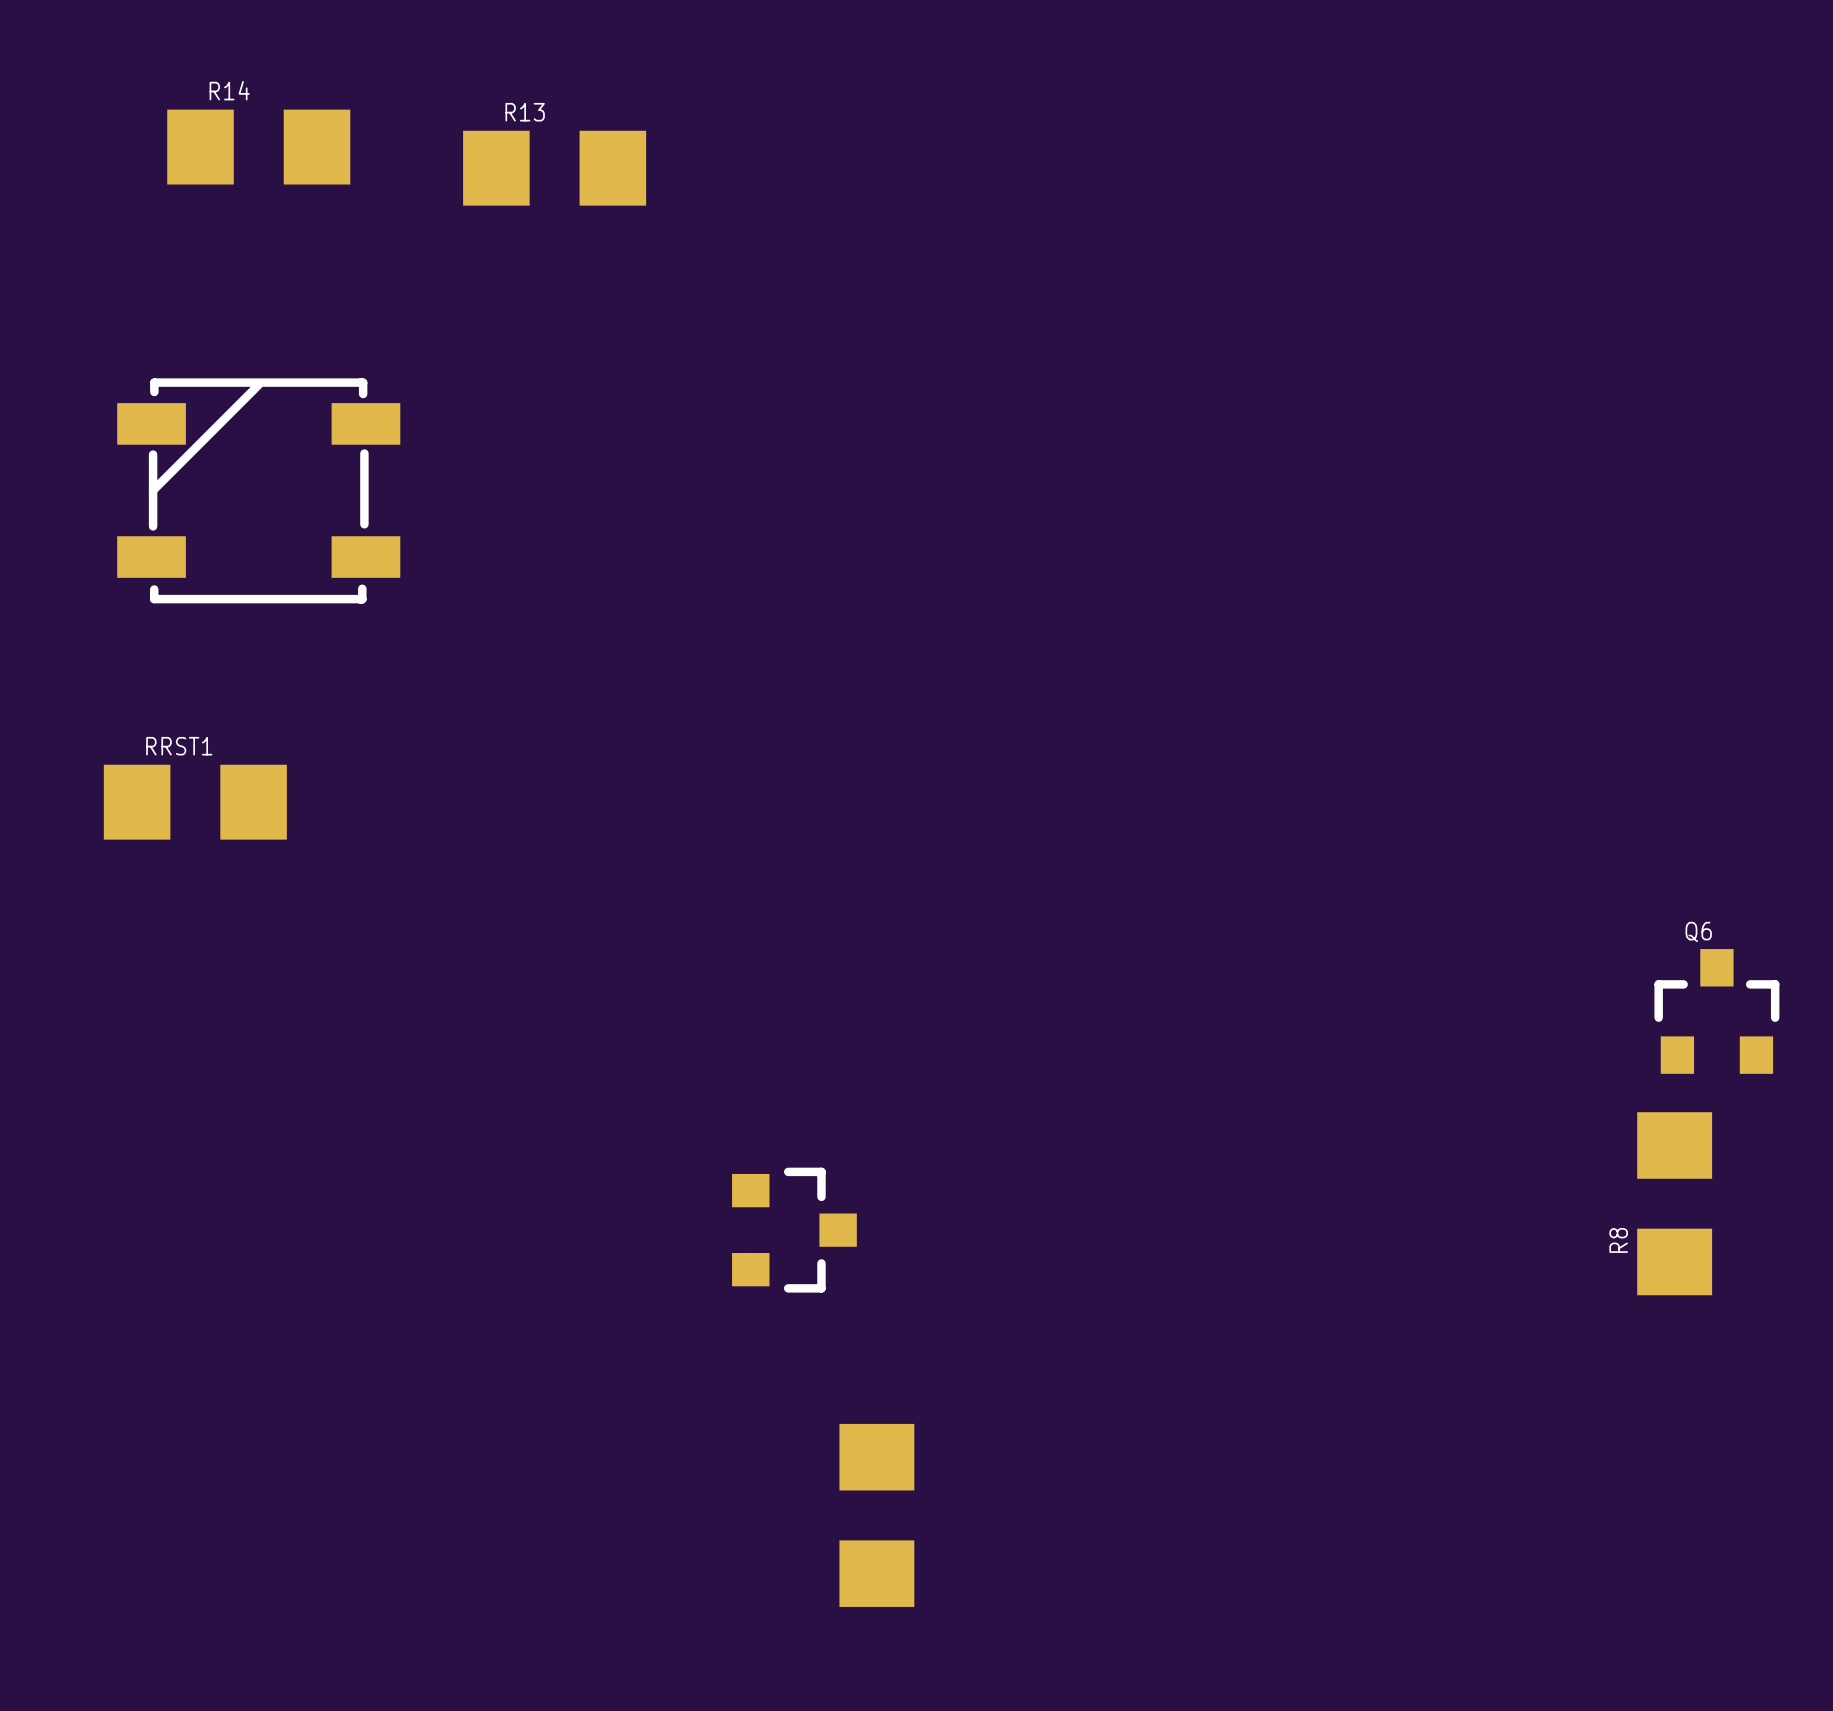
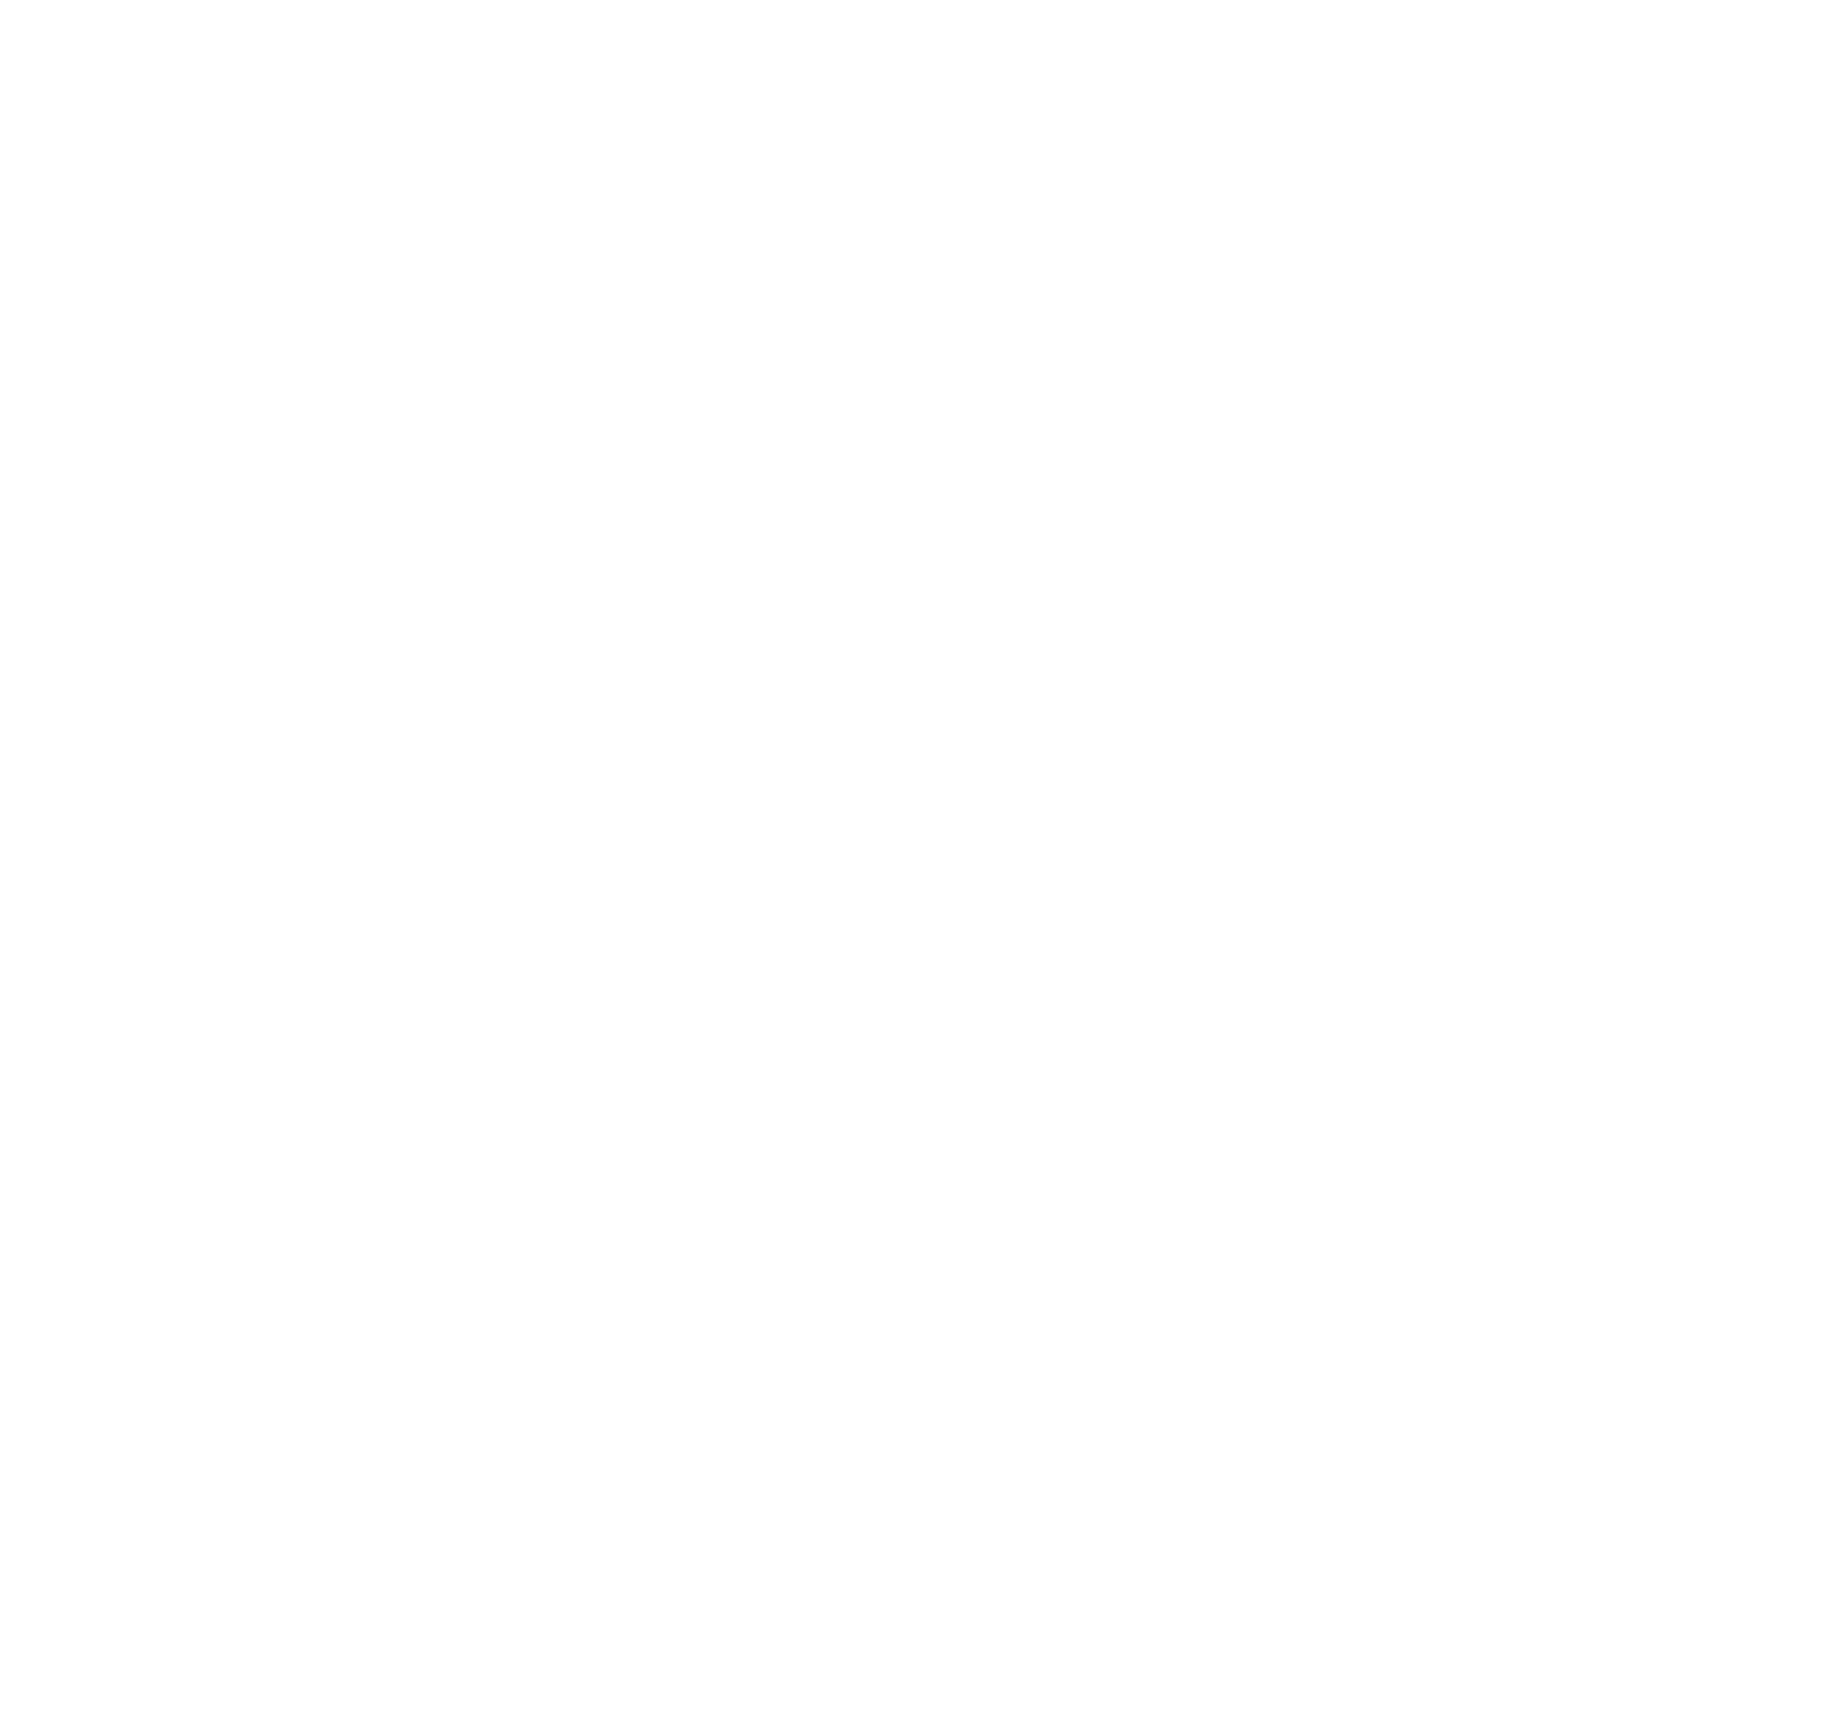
R14: (258, 147) -> none
R13: (554, 168) -> none
part: (258, 490) -> none
RRST1: (195, 802) -> none
Q6: (1716, 1011) -> none
R8: (1674, 1203) -> none
part: (794, 1230) -> none
part: (876, 1515) -> none

